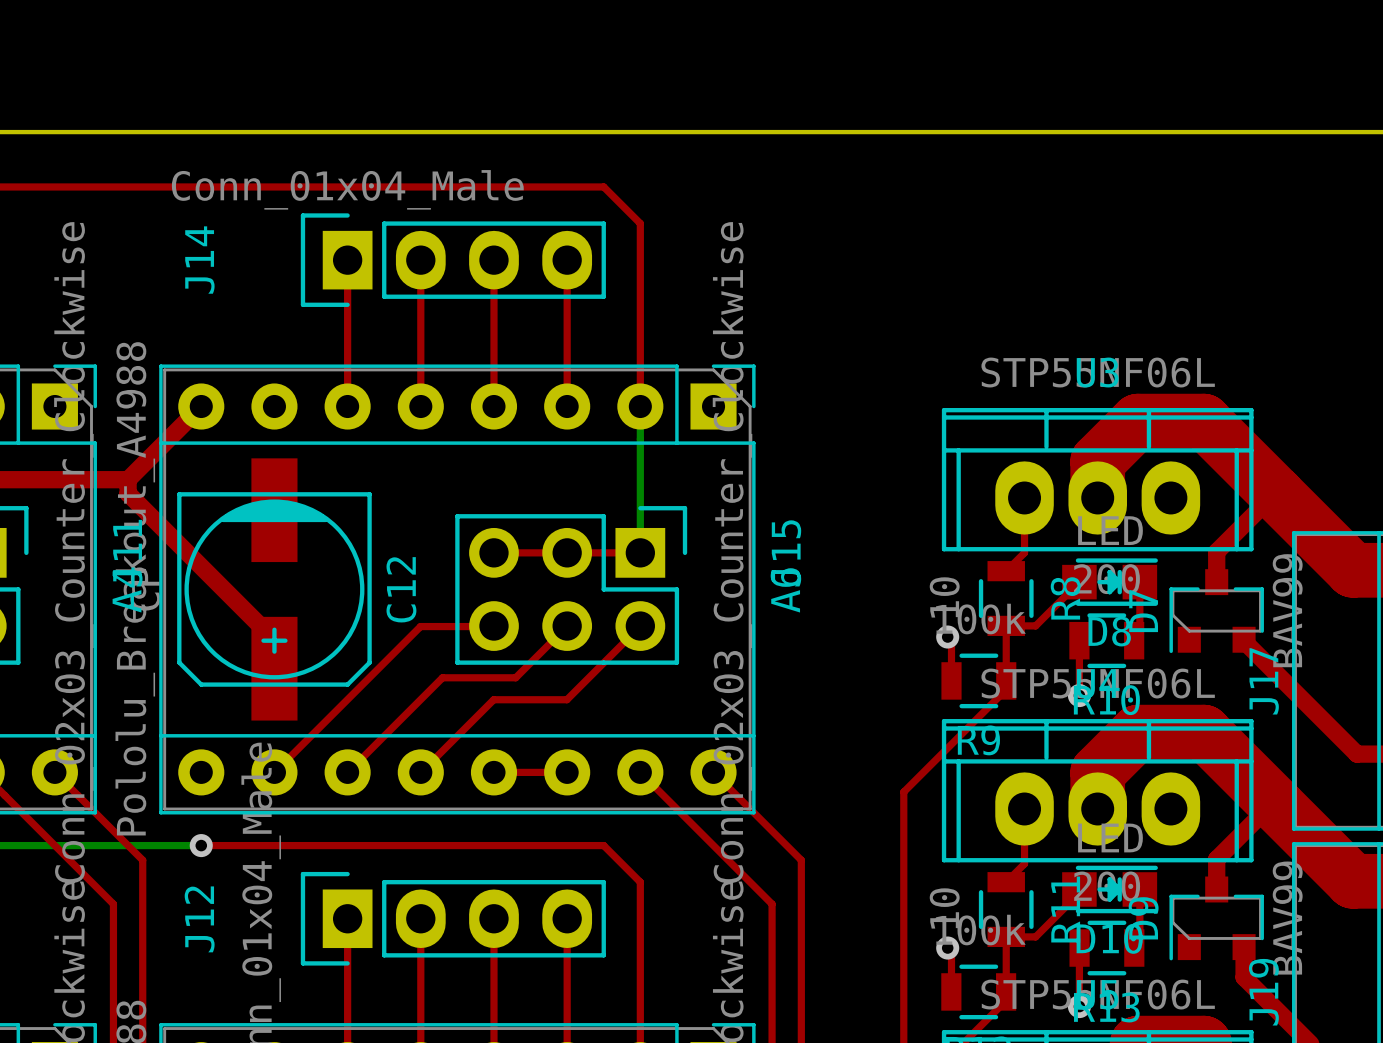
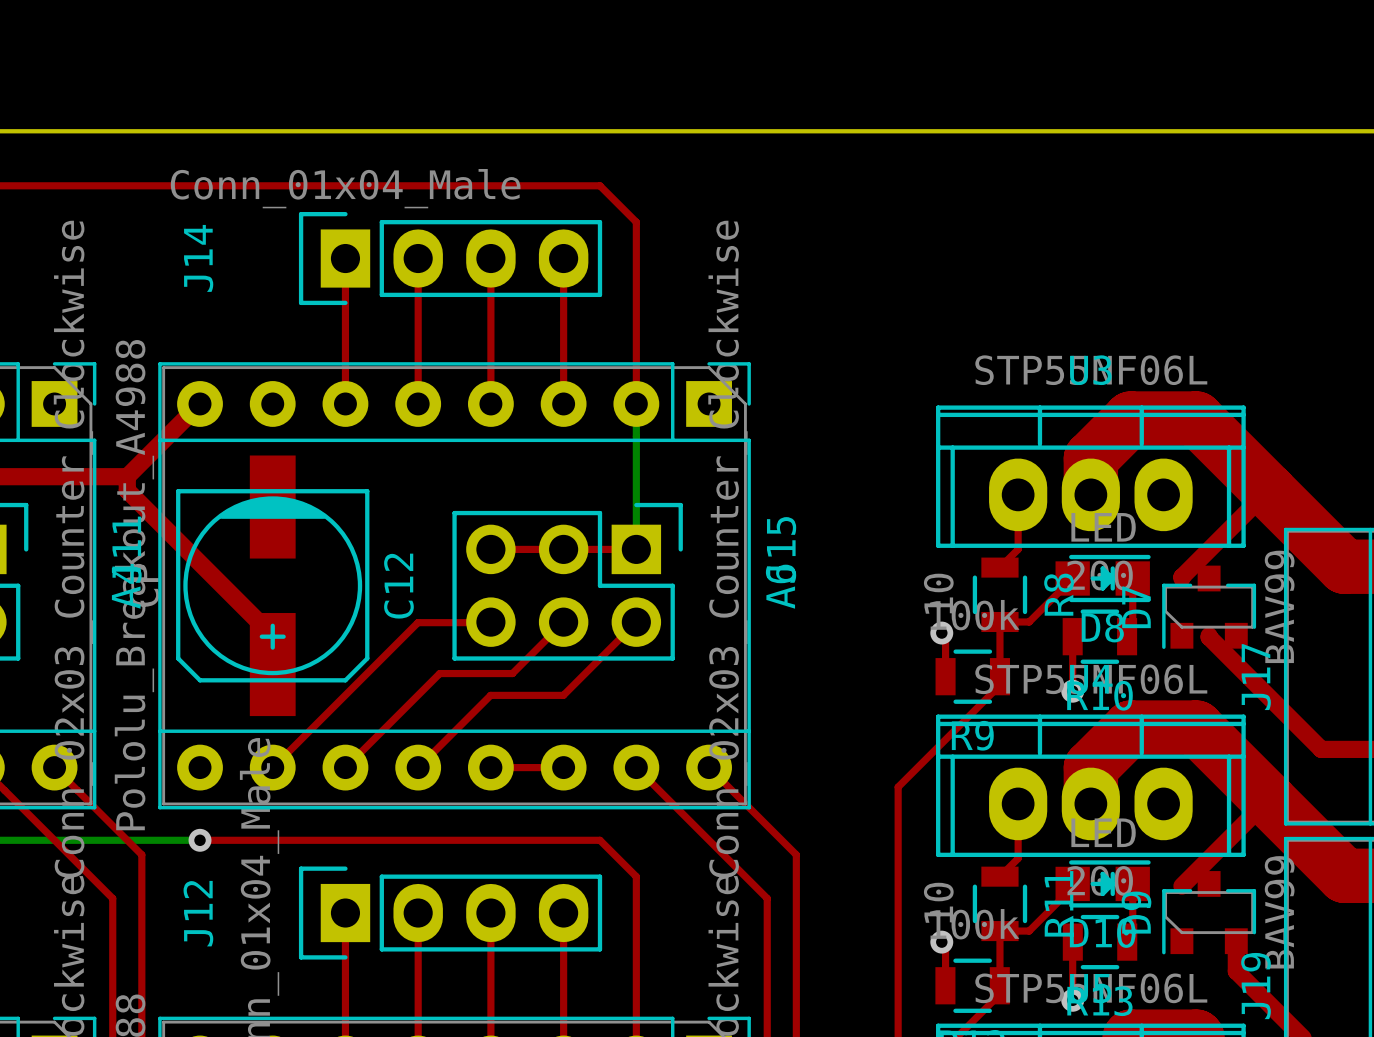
top track: (1275, 494) (1216, 551) (1216, 582) -> (1267, 491) (1181, 578)
top track: (1244, 639) (1356, 754) -> (1209, 635) (1321, 749) (1348, 749)
top track: none -> (1267, 800) (1181, 886)
top track: (1277, 805) (1270, 805) (1216, 859) (1216, 889) -> none

